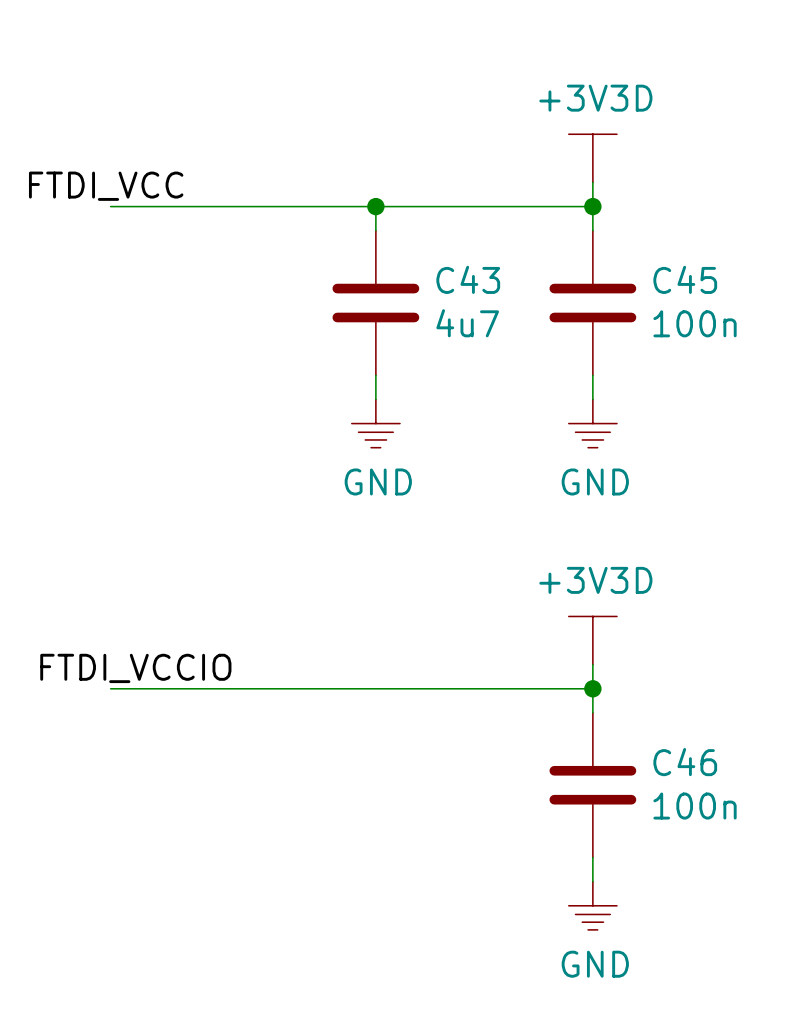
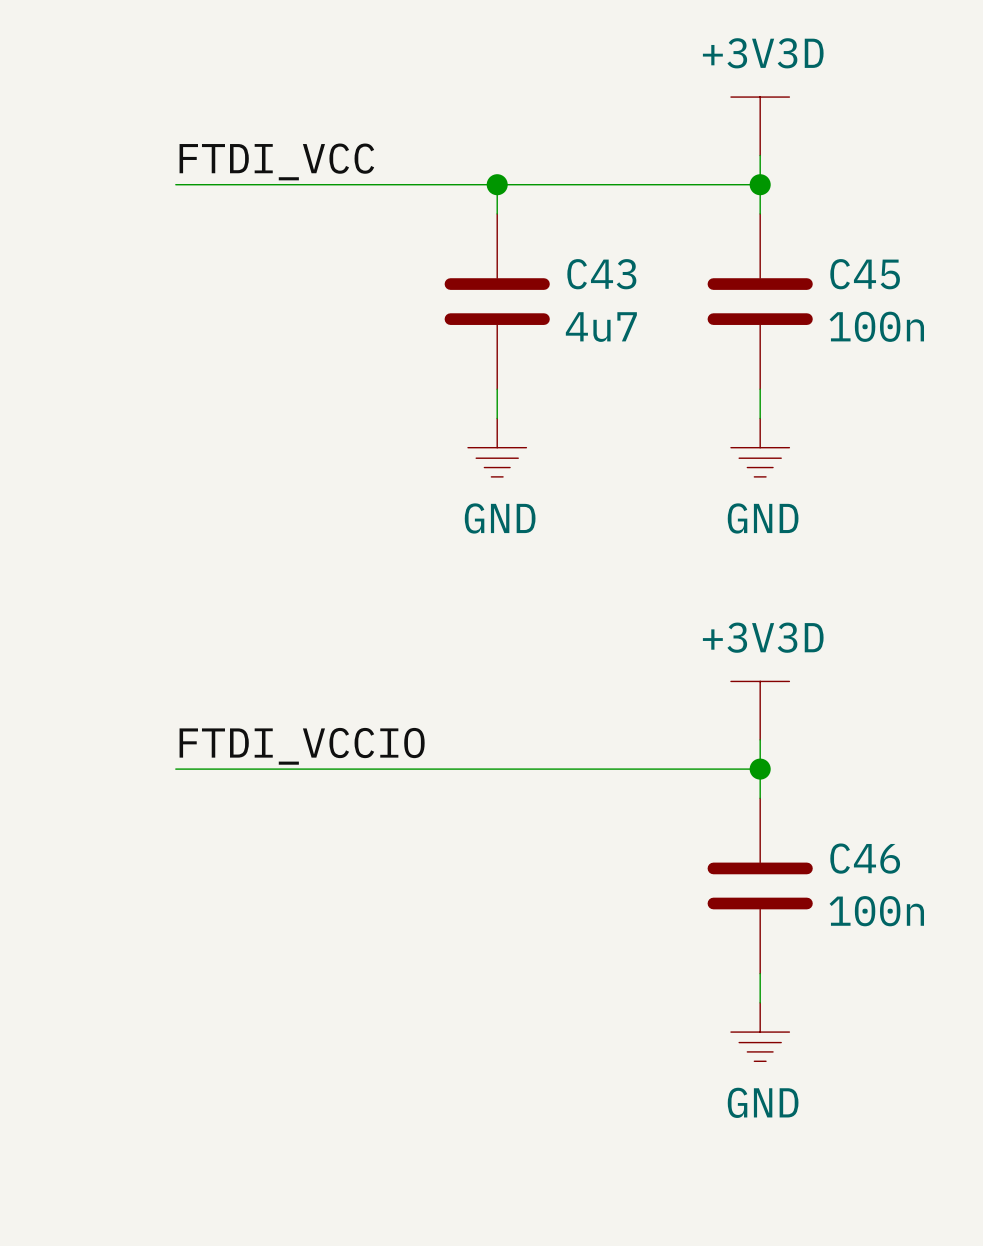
label position: FTDI_VCC (106, 186) -> FTDI_VCC (276, 161)
label position: FTDI_VCCIO (135, 668) -> FTDI_VCCIO (302, 746)

